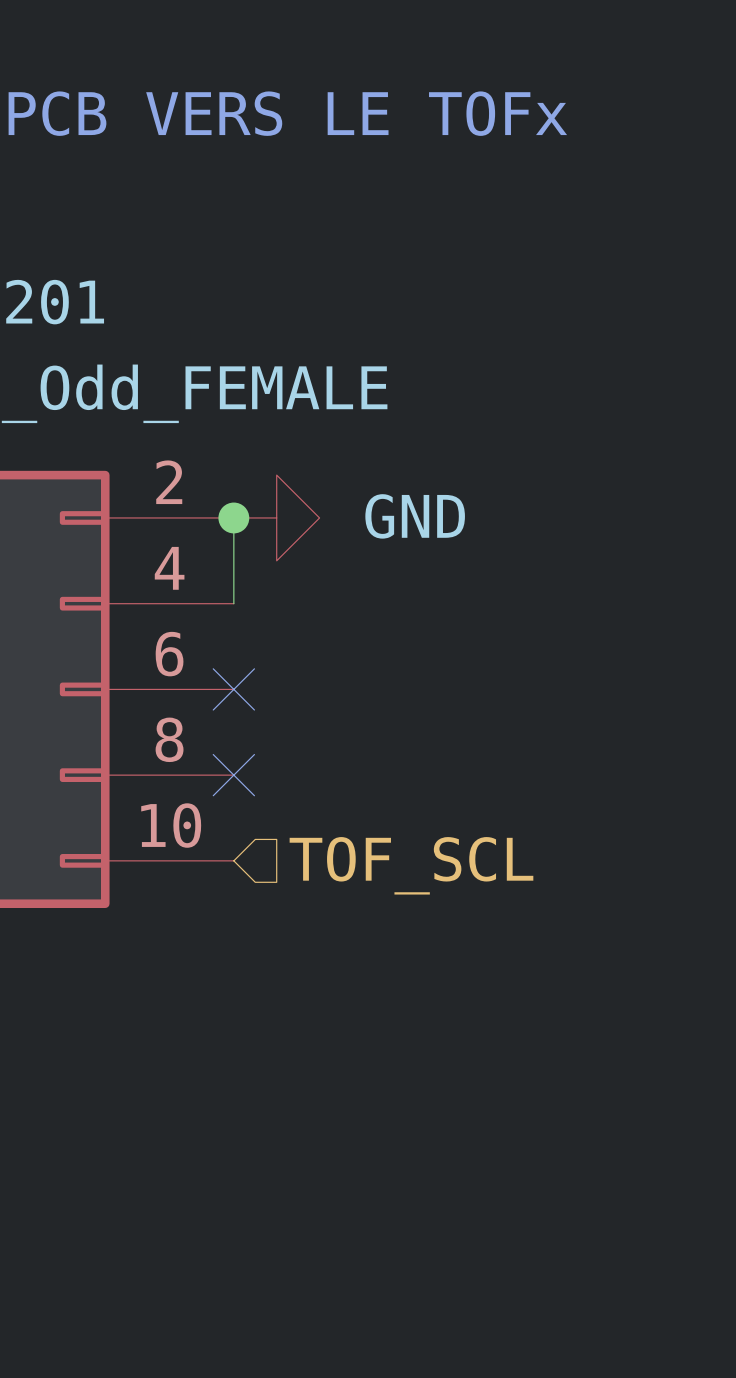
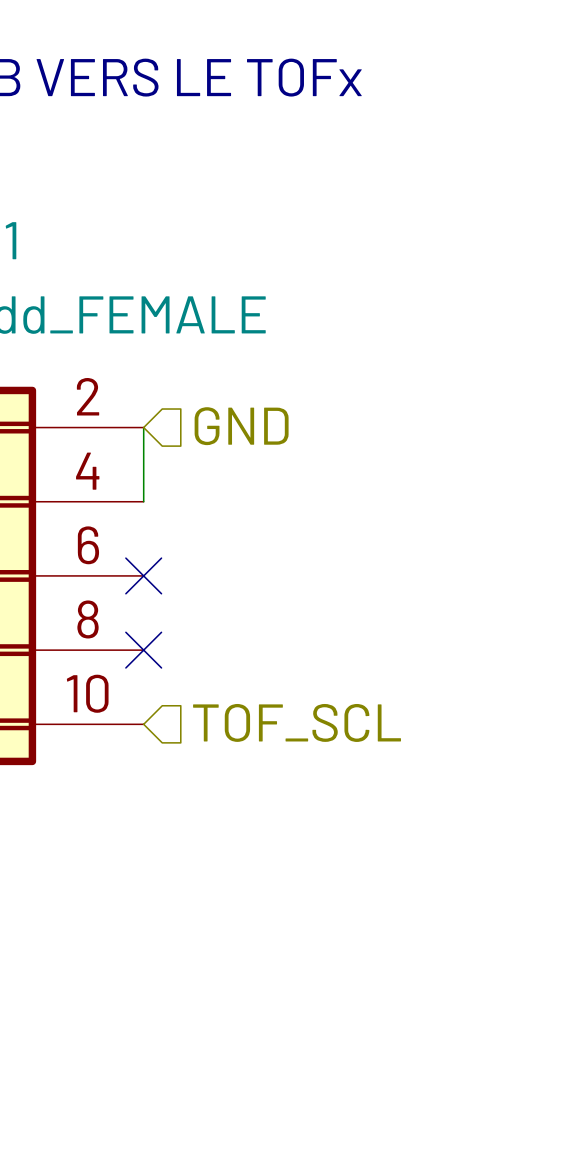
hierarchical label: none -> GND (241, 426)
junction: (233, 517) -> none
power symbol: GND (276, 517) -> none

